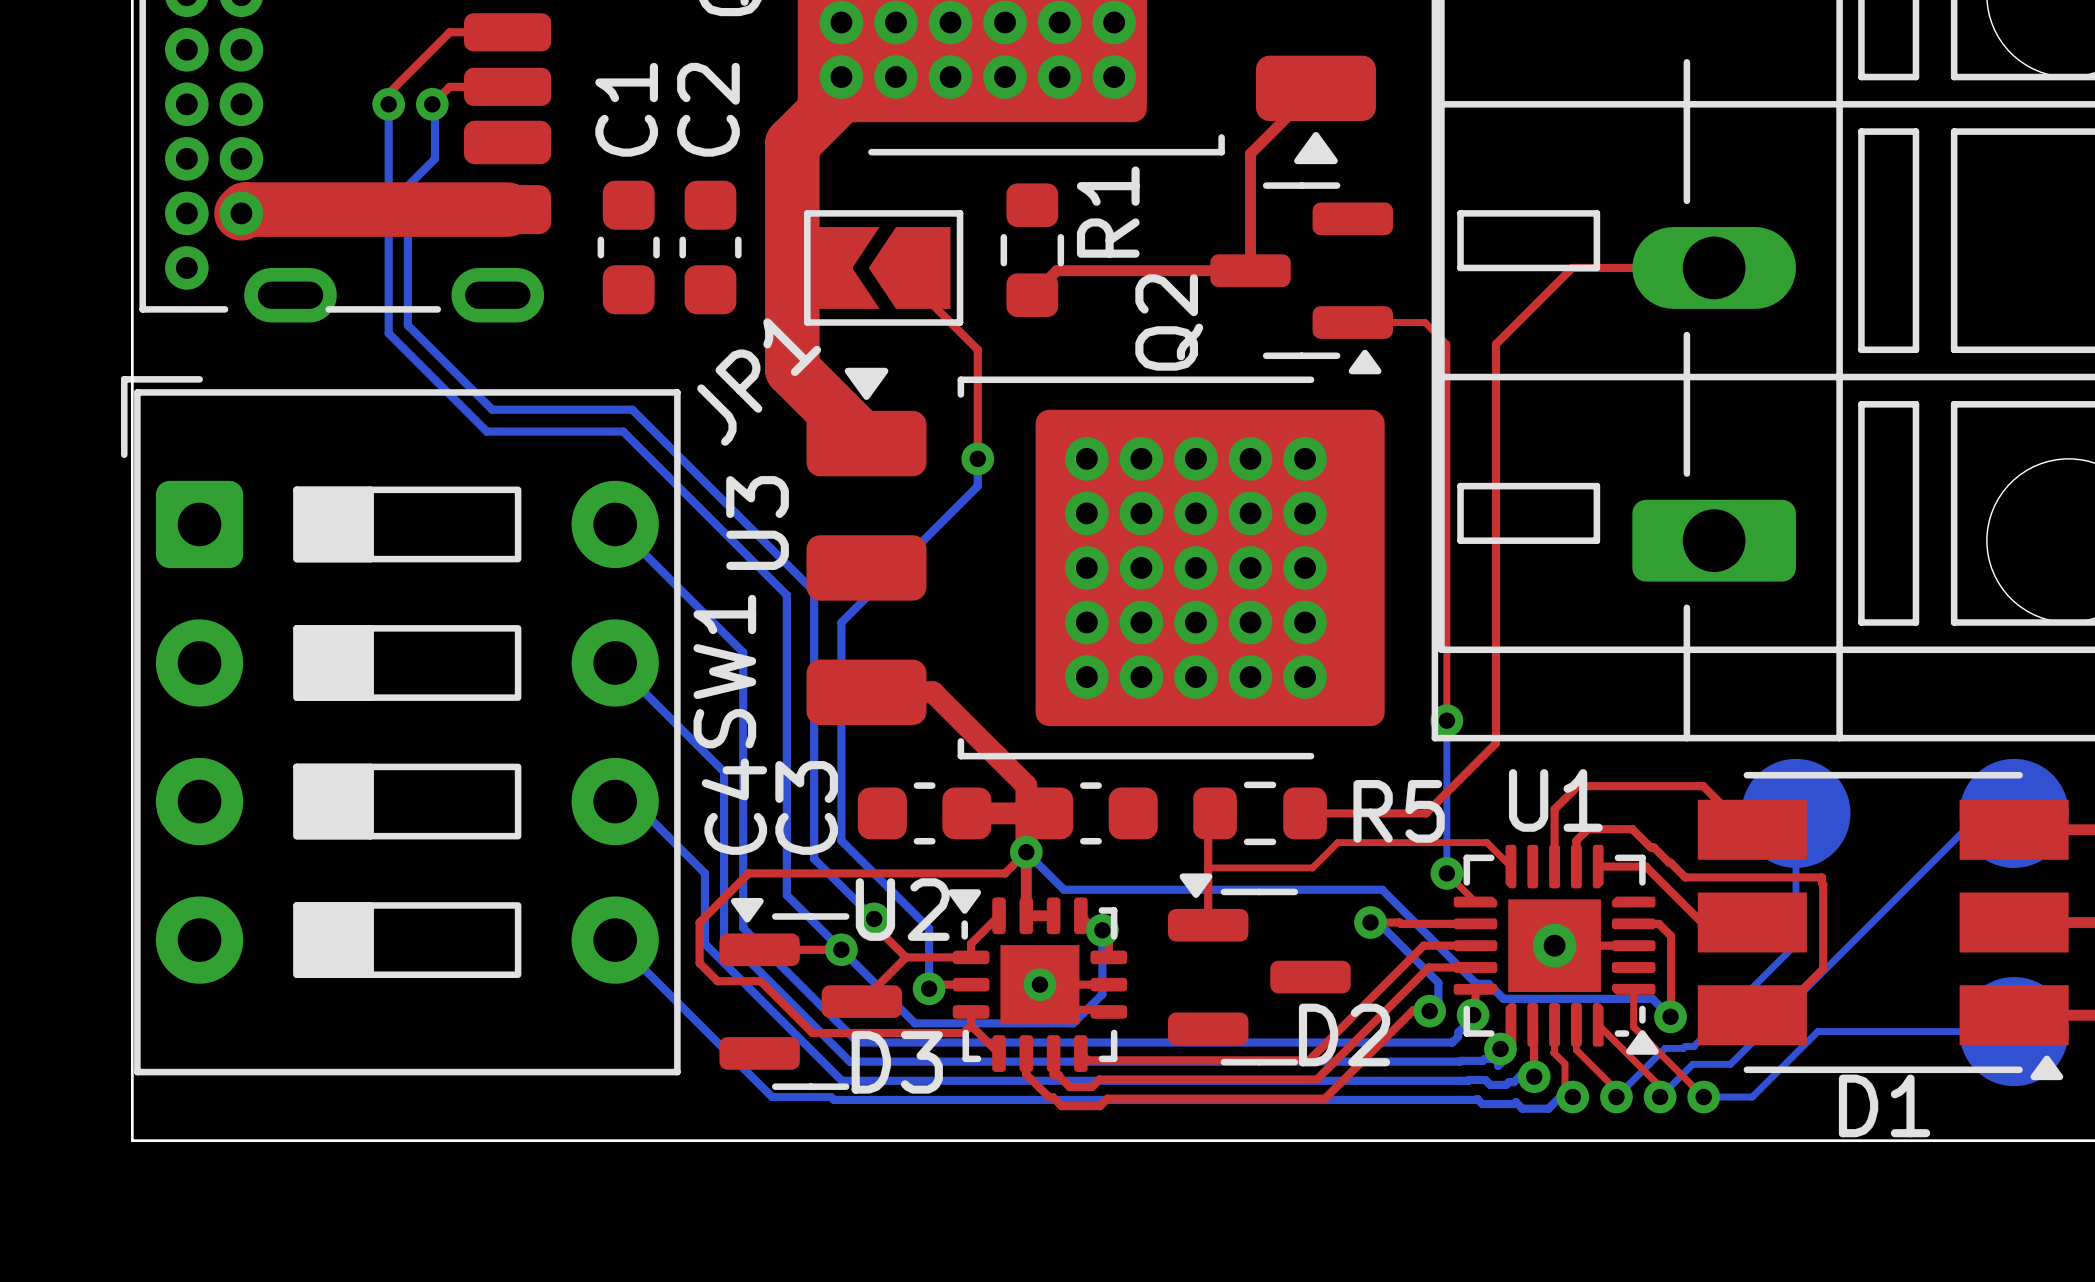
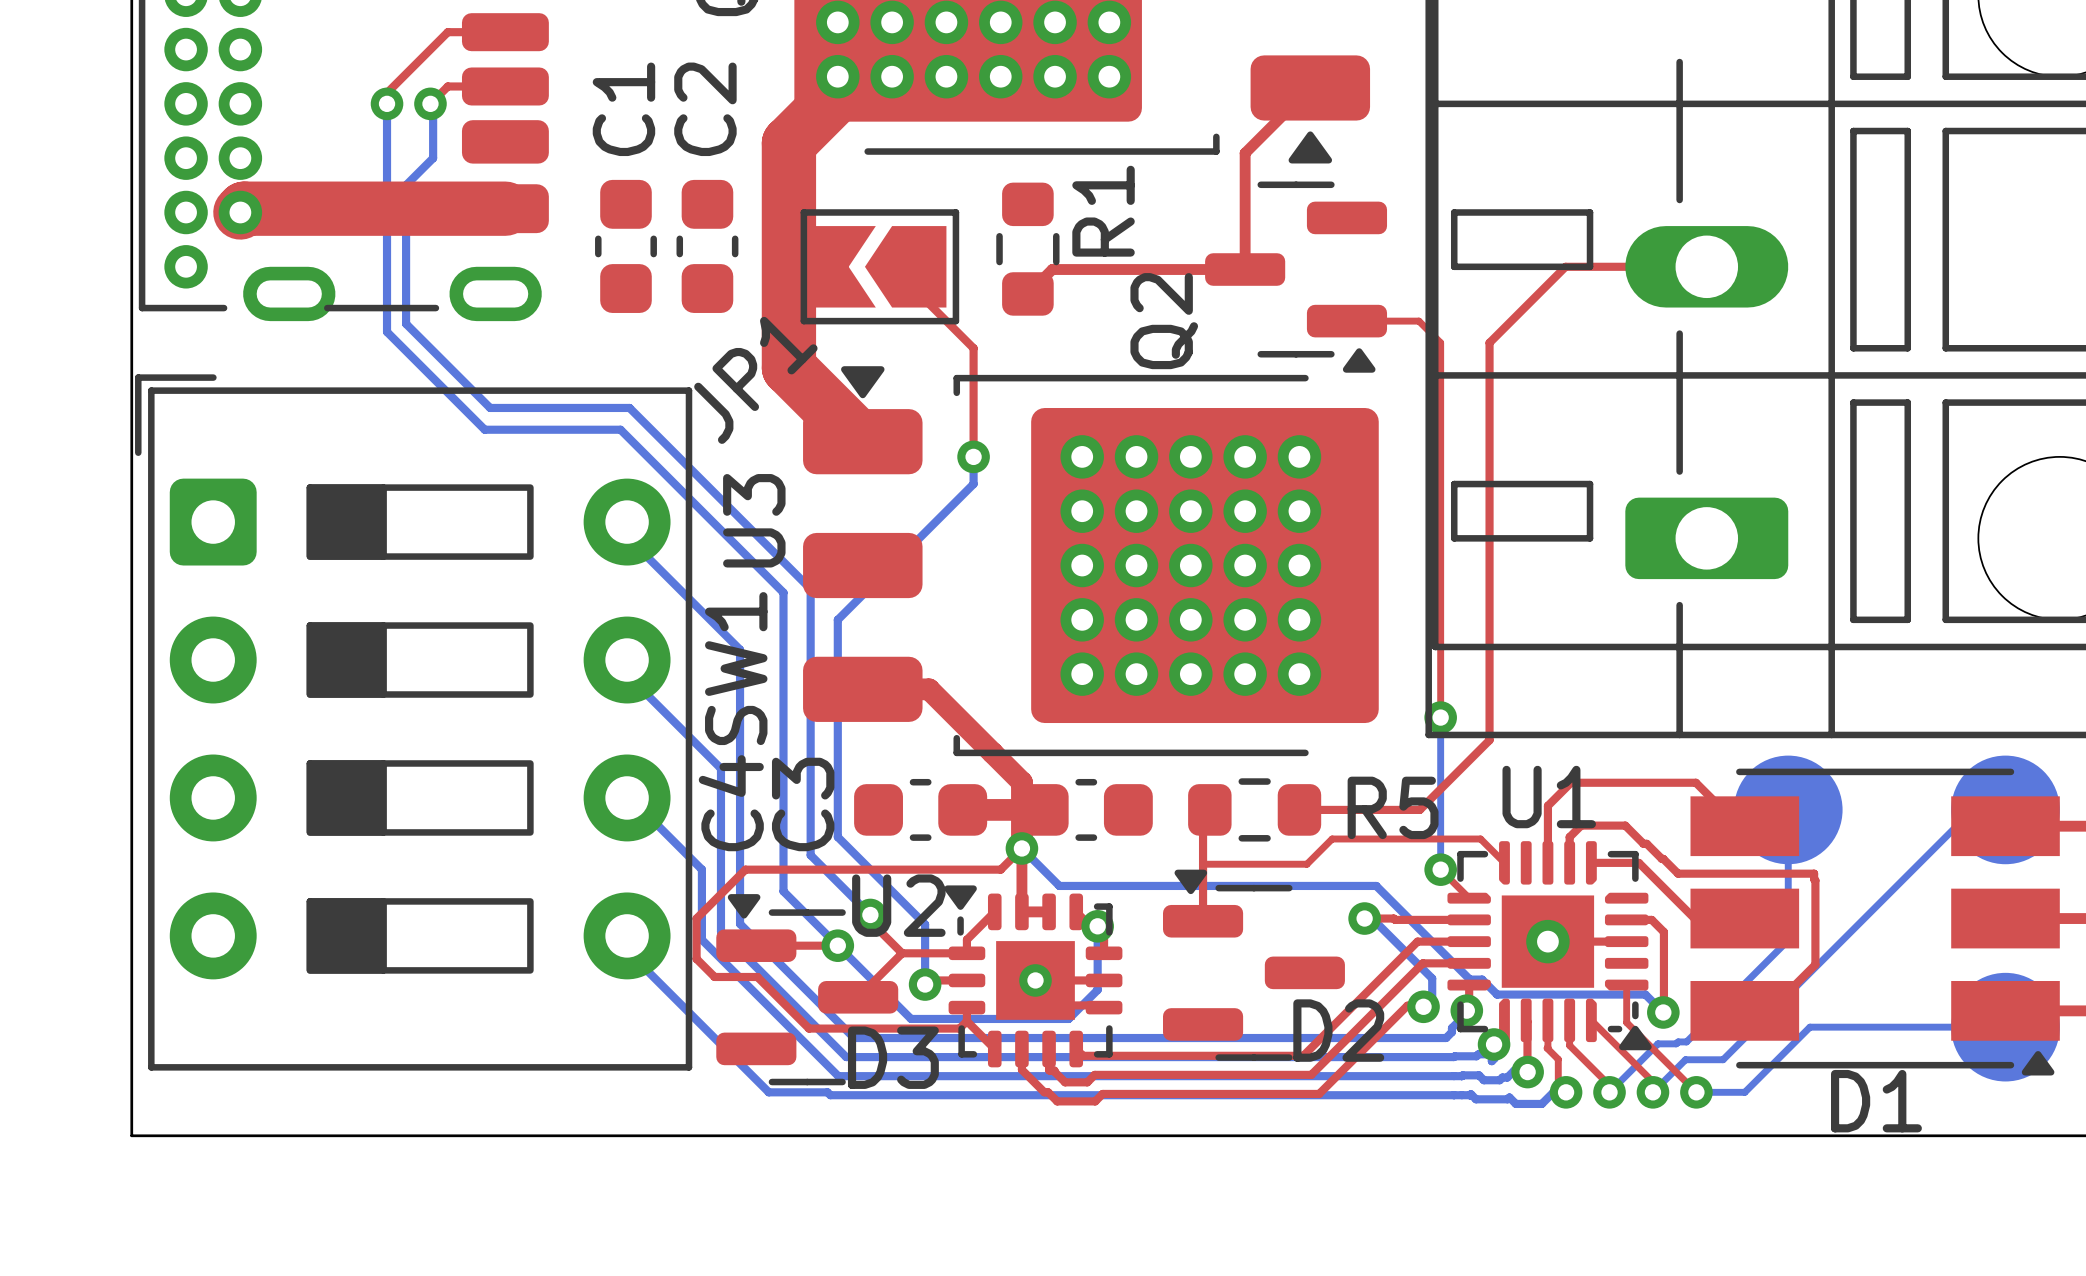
SW1 position: (400, 725) -> (413, 722)

